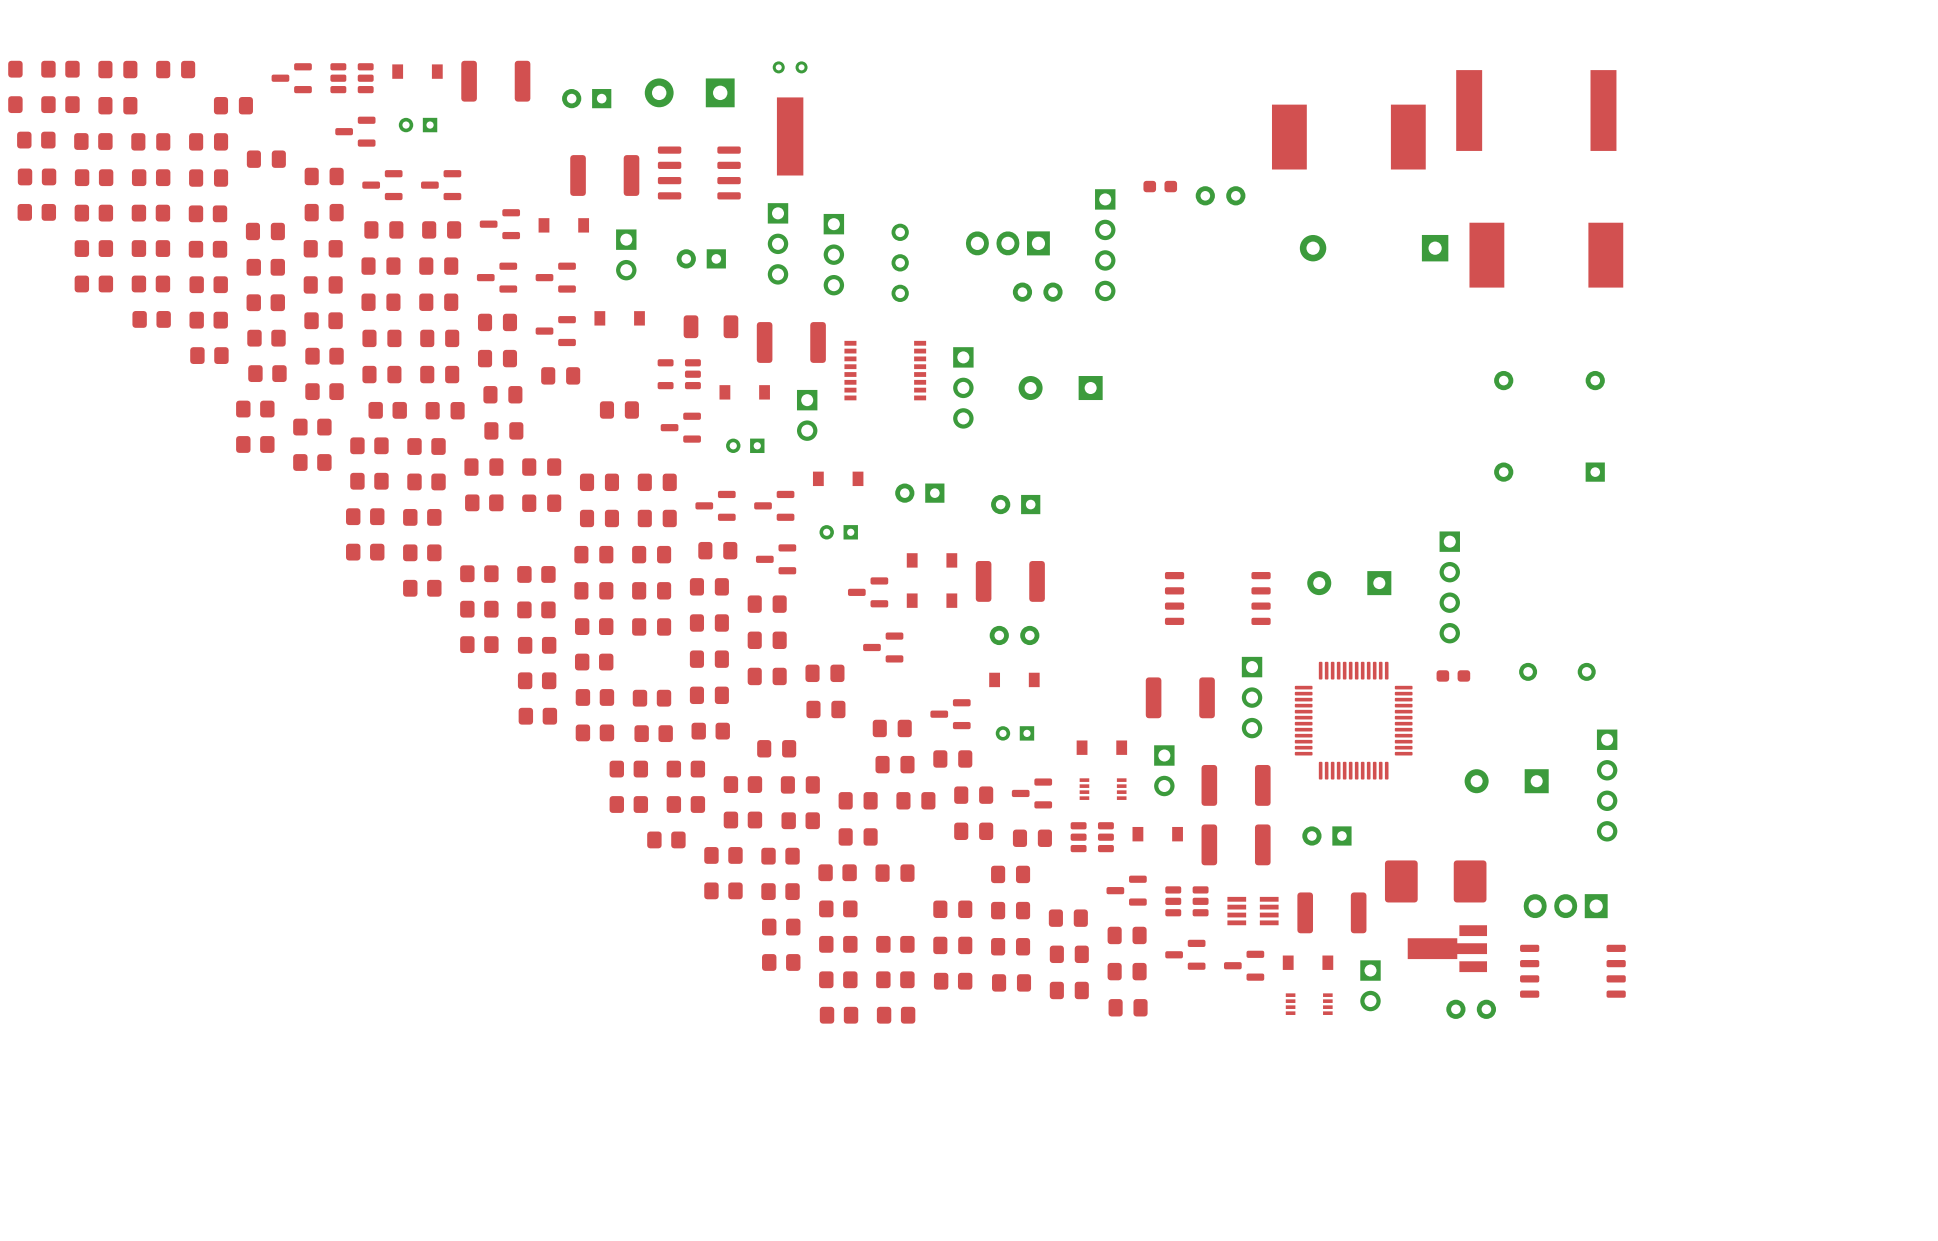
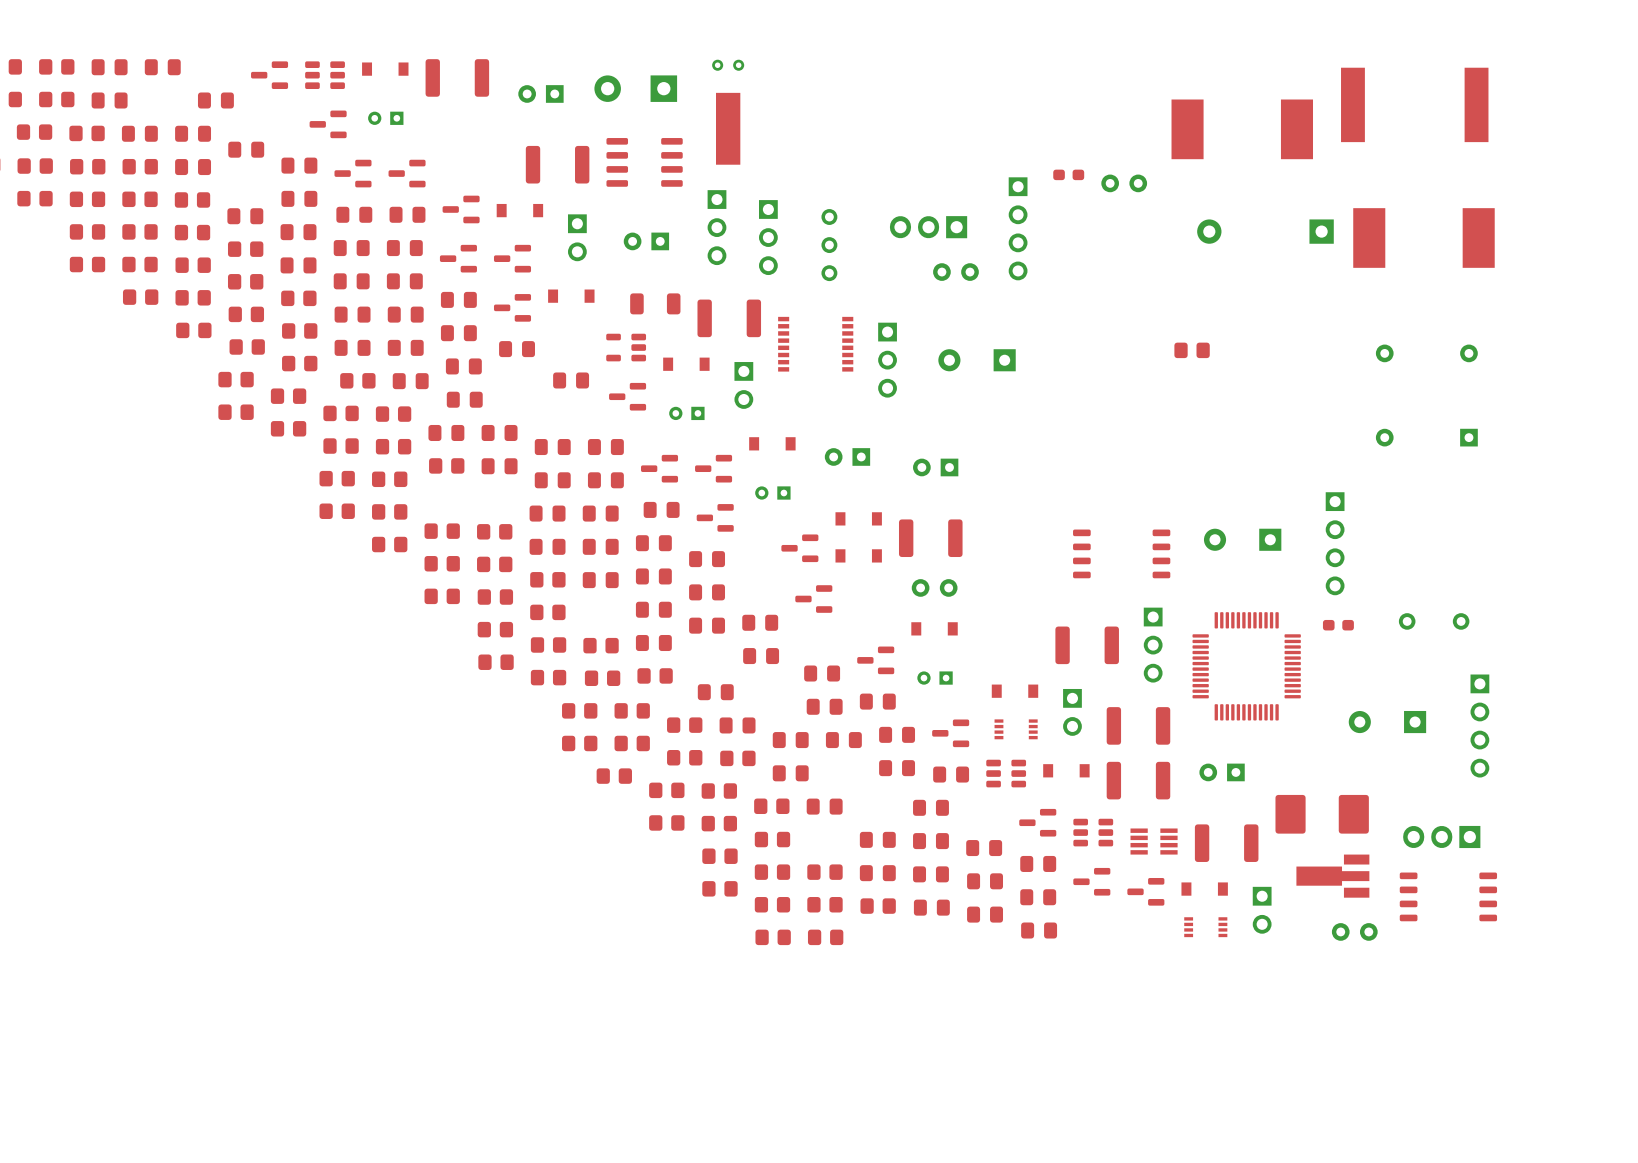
part: none -> (1192, 350)

